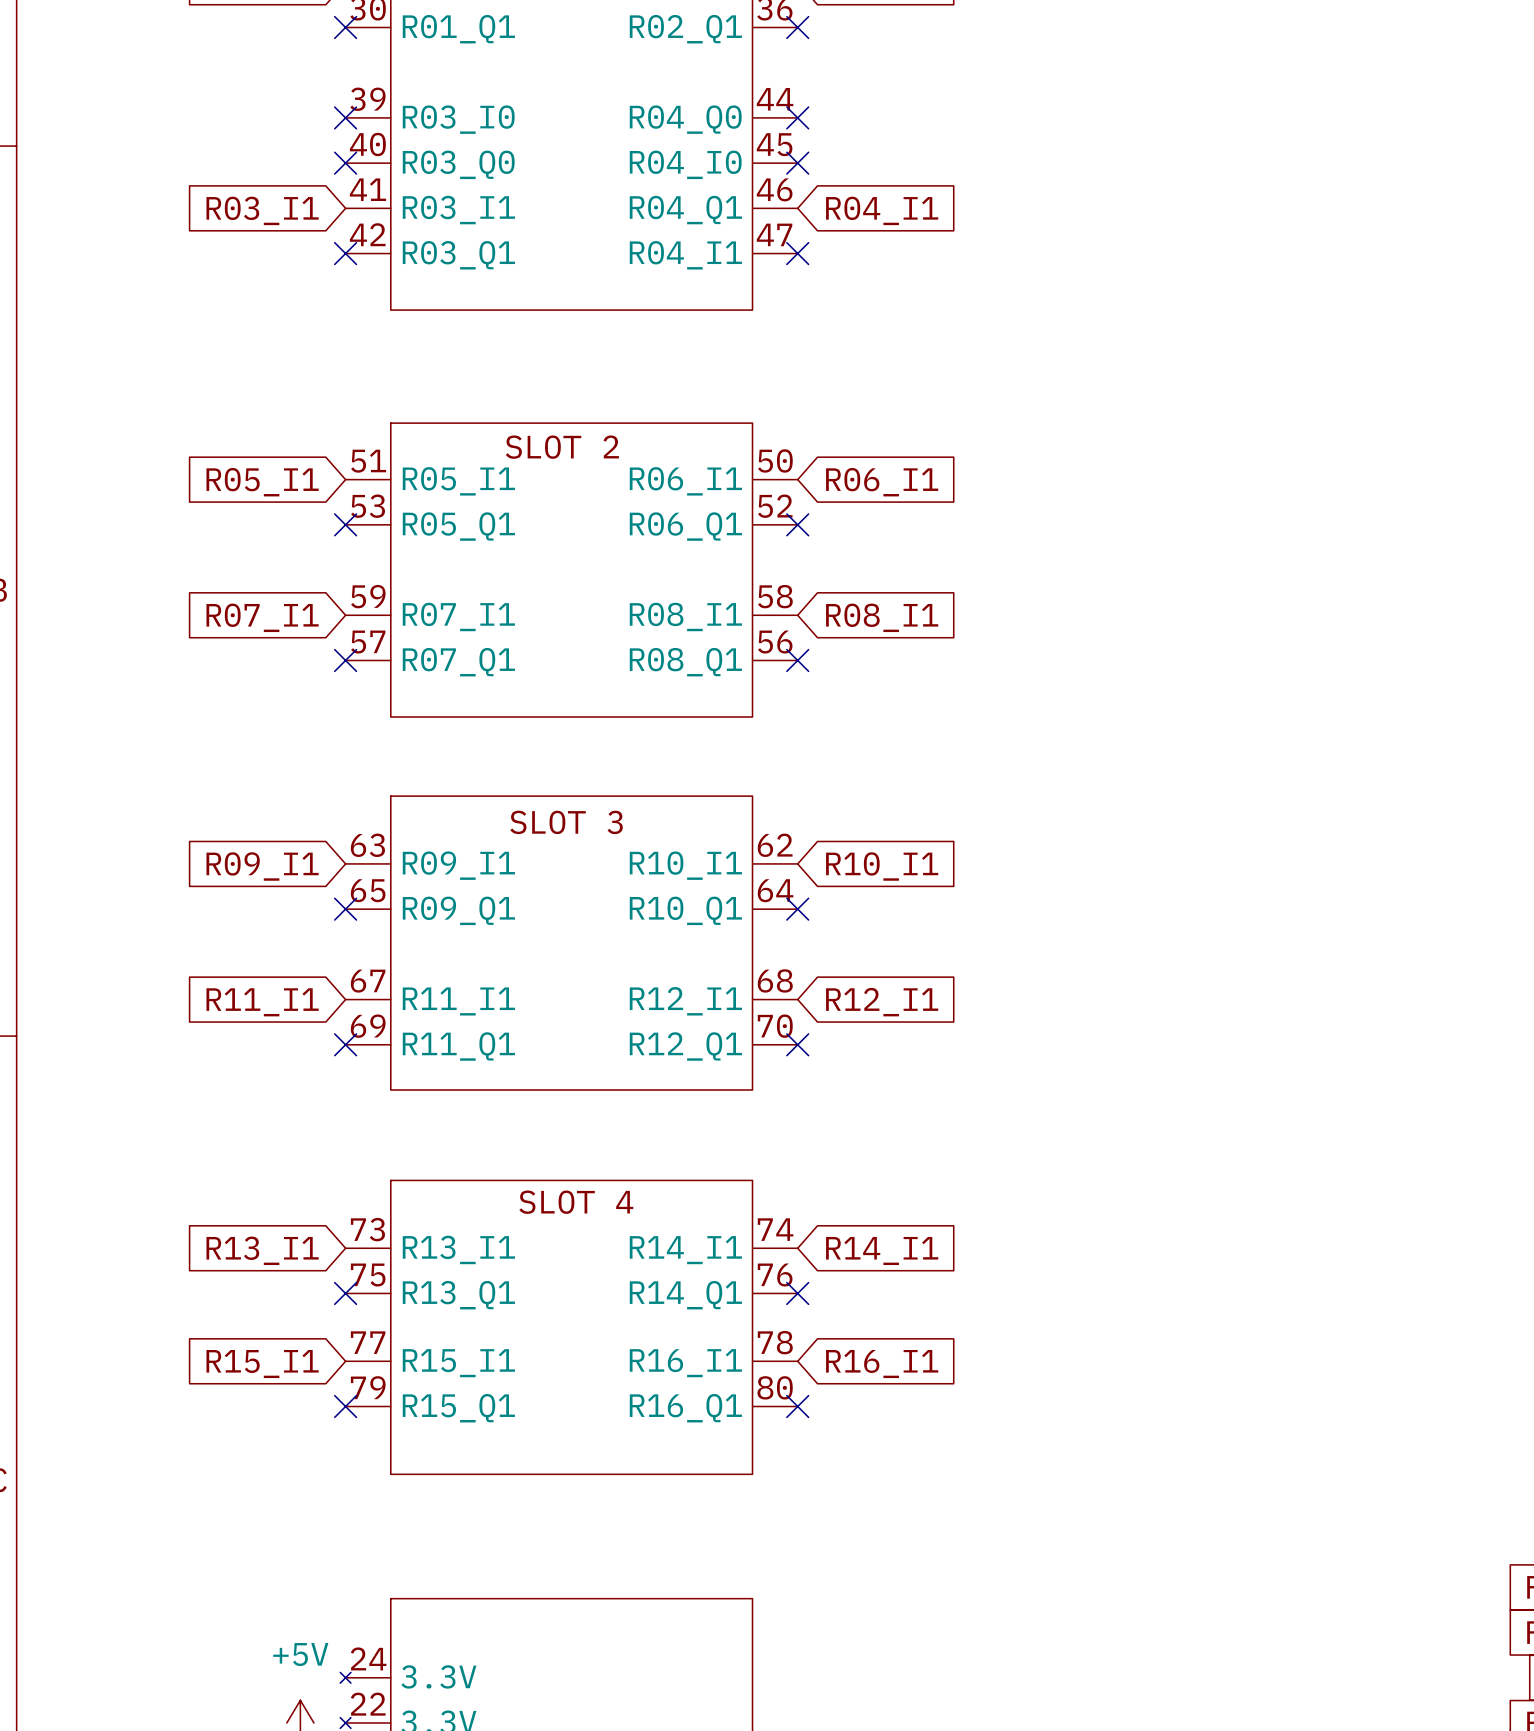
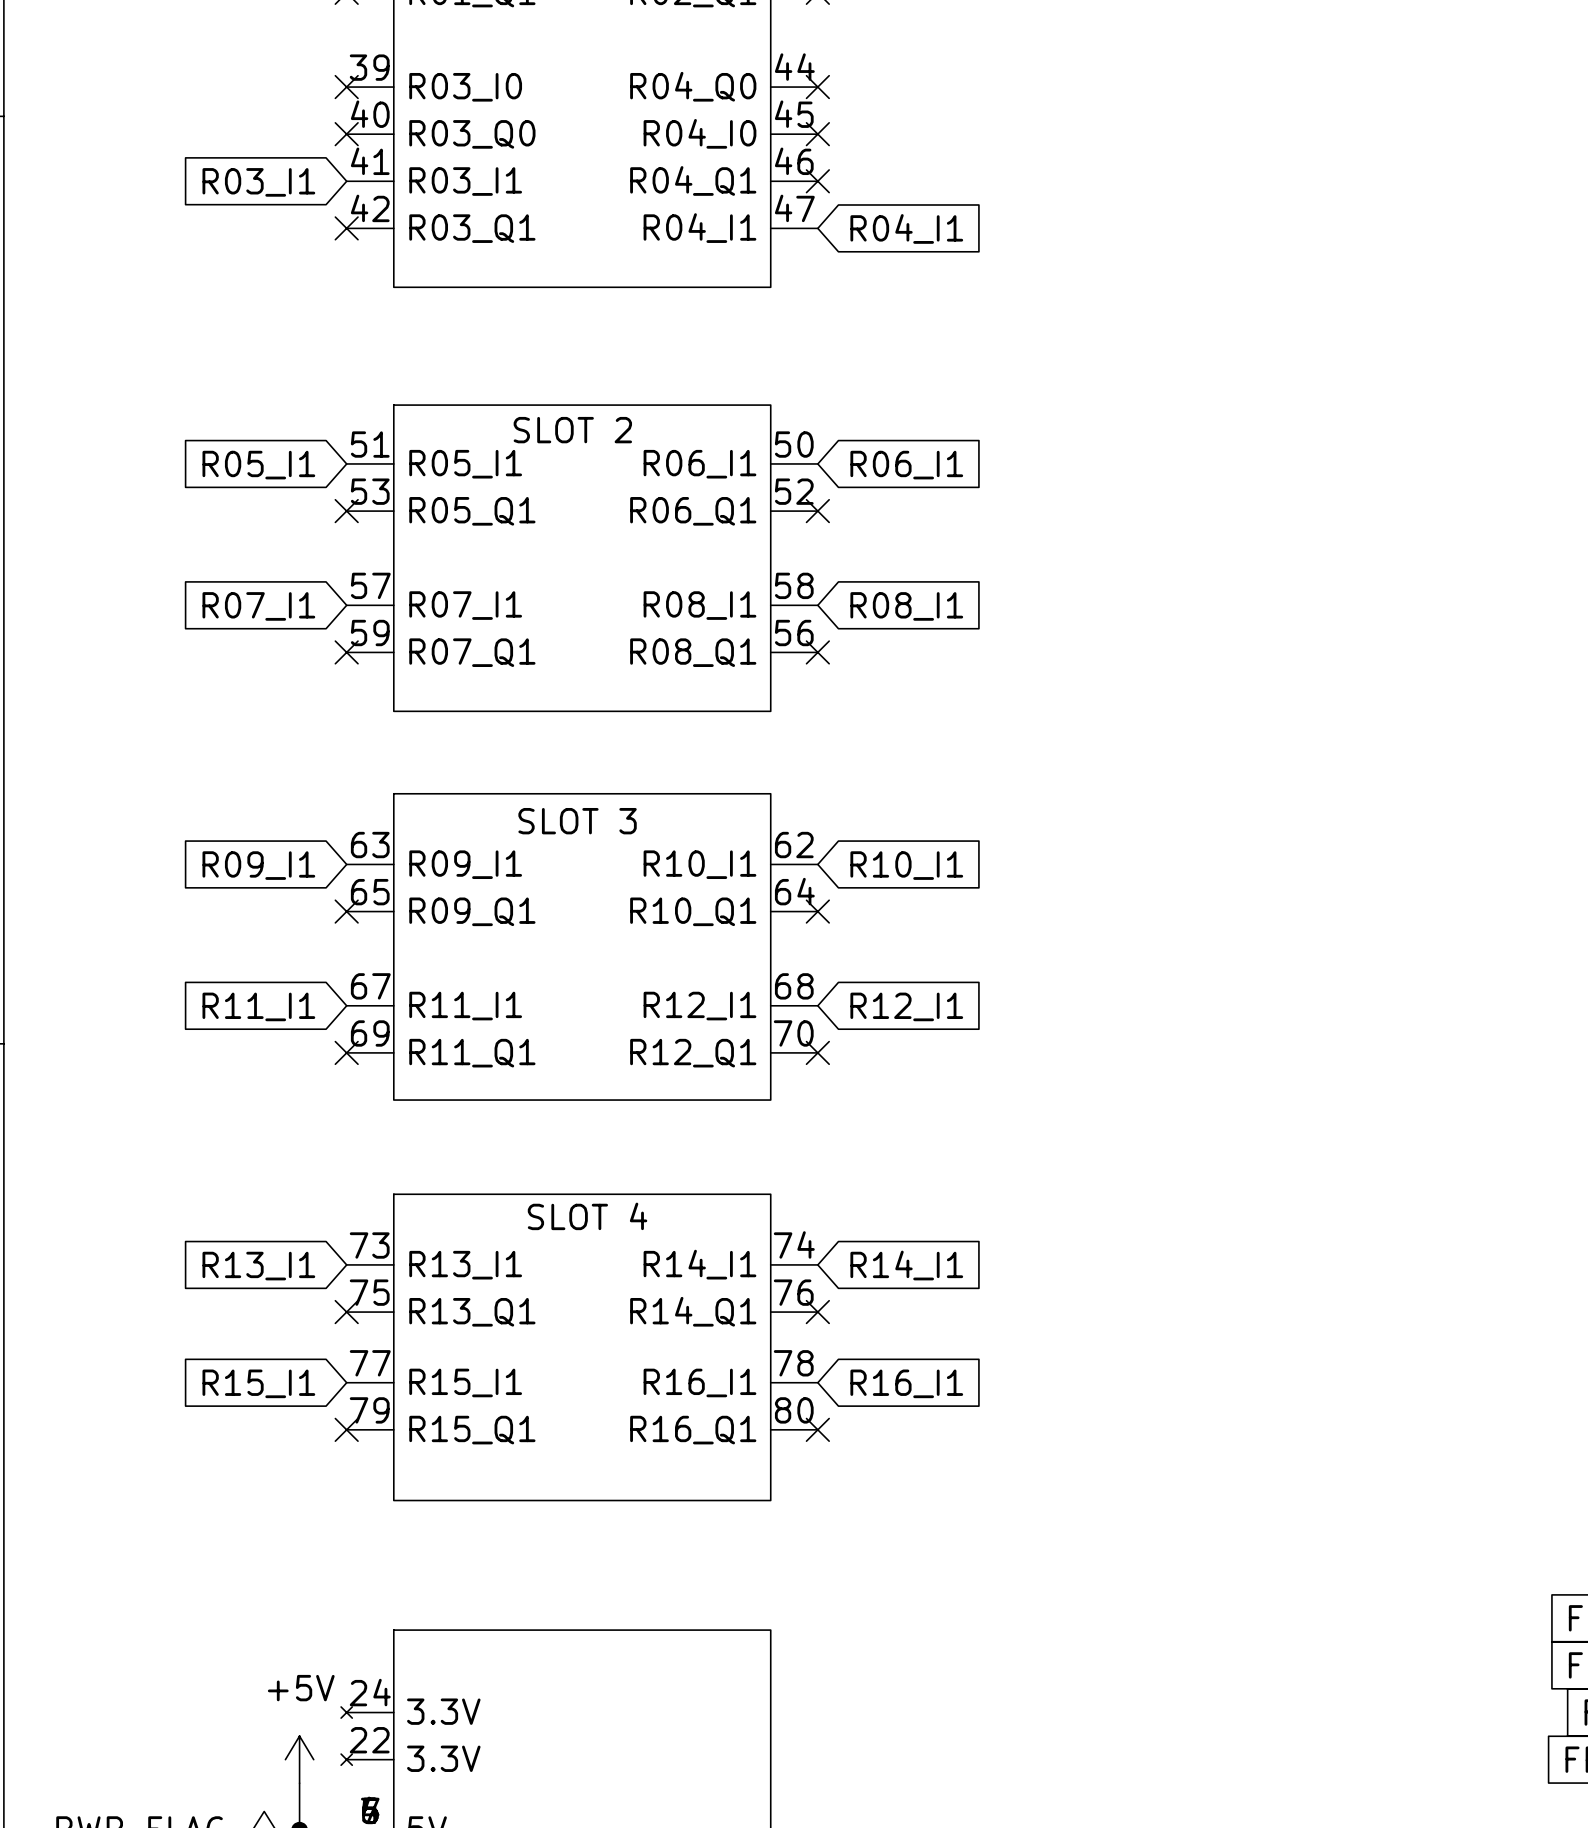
global label position: R04_I1 (882, 210) -> R04_I1 (906, 228)
no-connect mark position: (797, 253) -> (817, 181)
part pin number: 59 (368, 596) -> 57 (370, 585)
part pin number: 57 (368, 642) -> 59 (370, 633)

